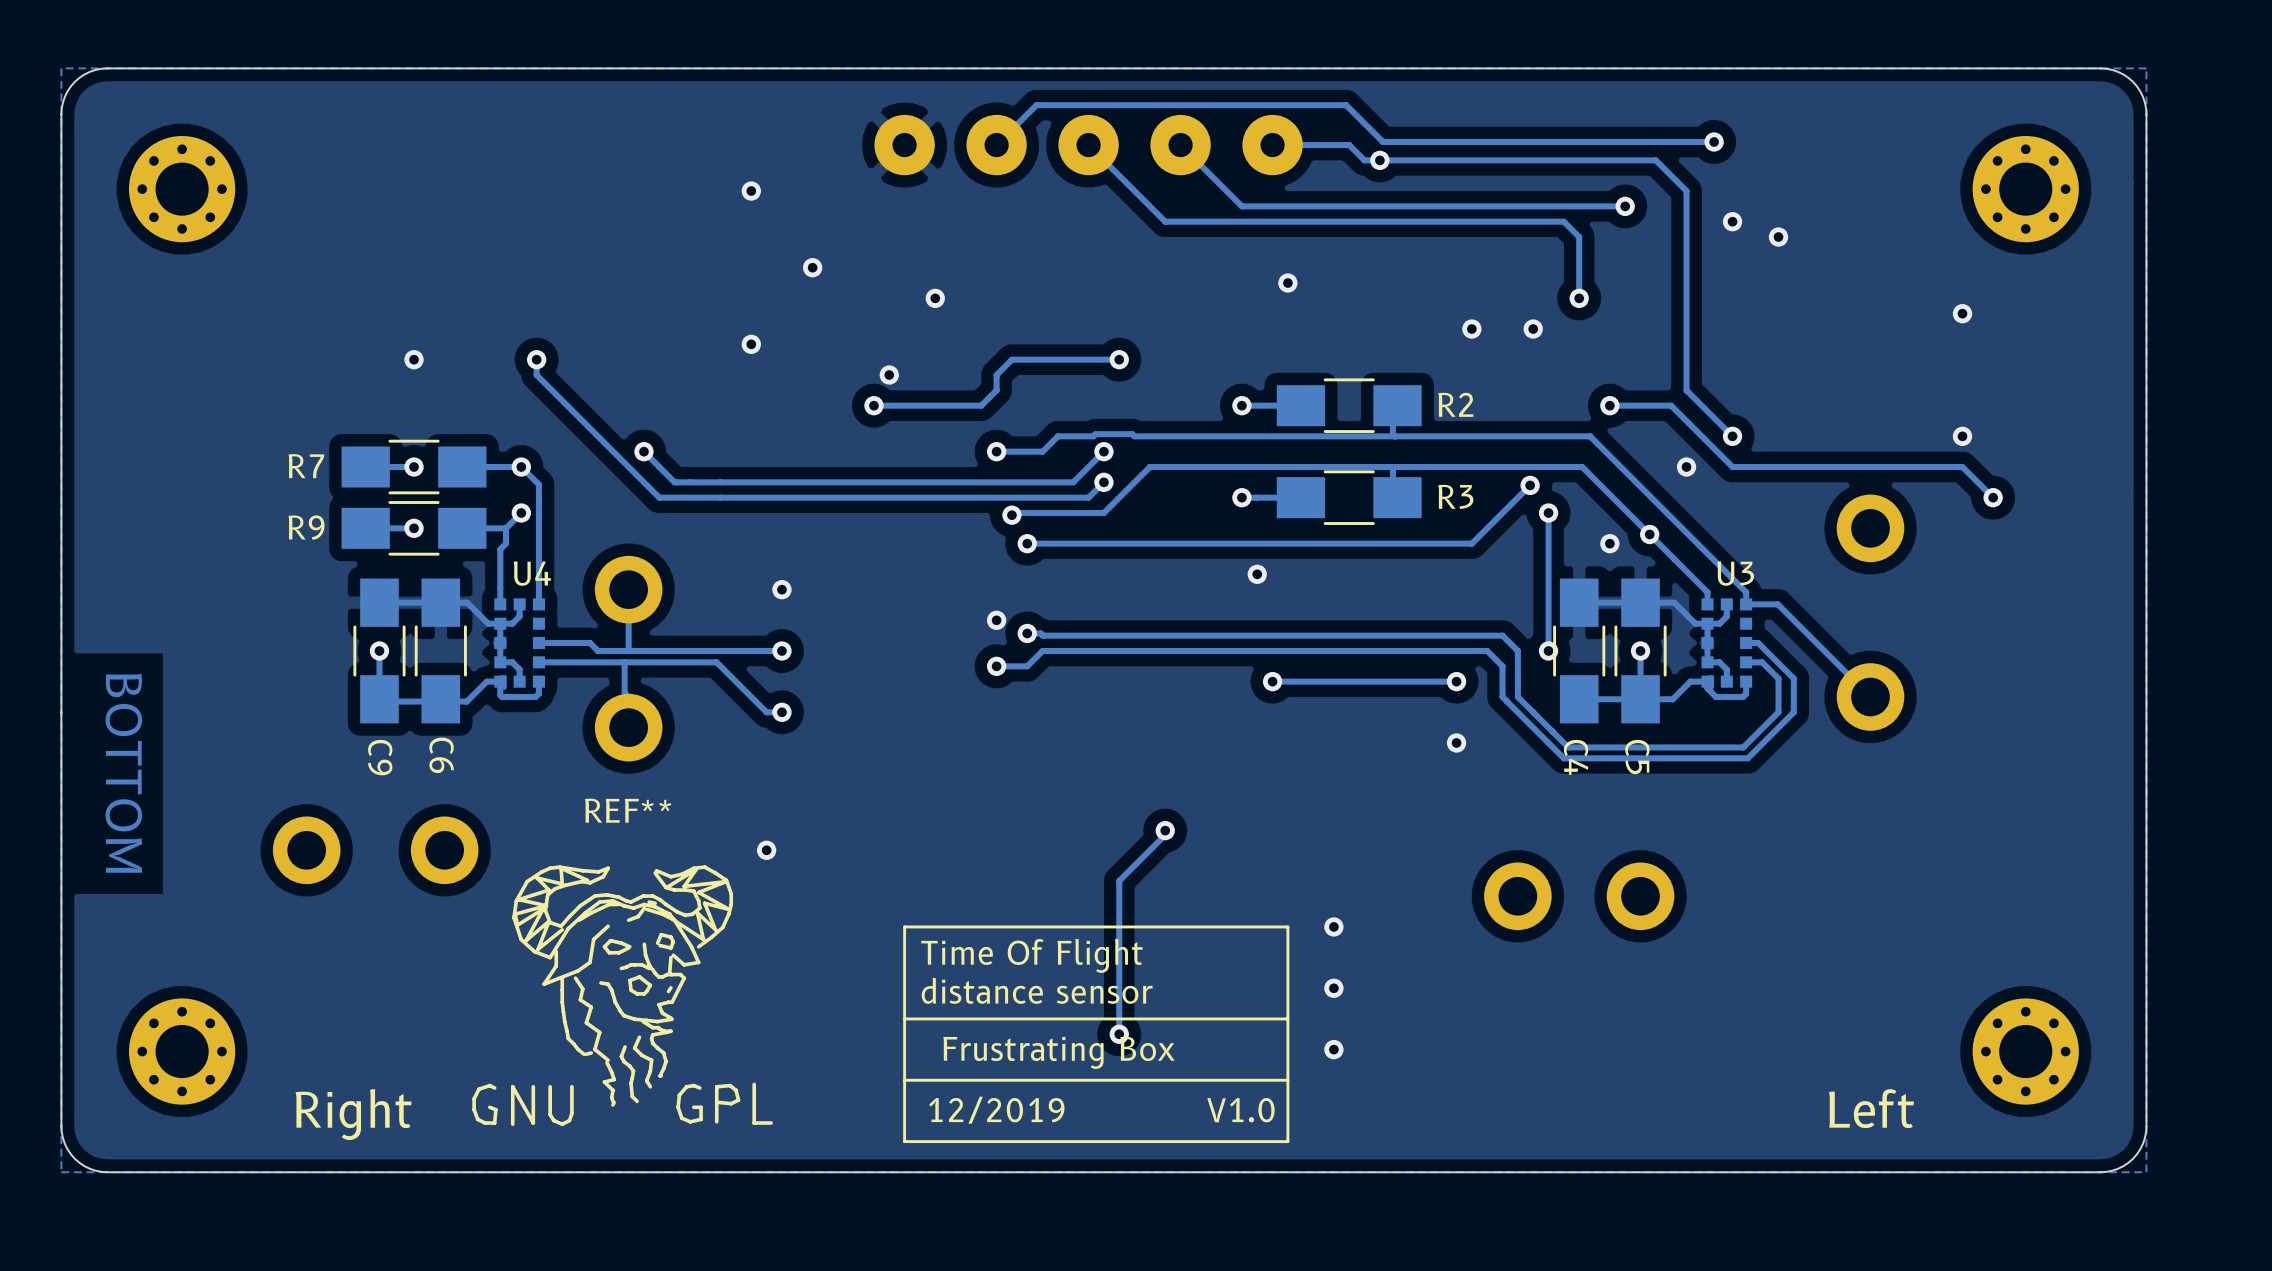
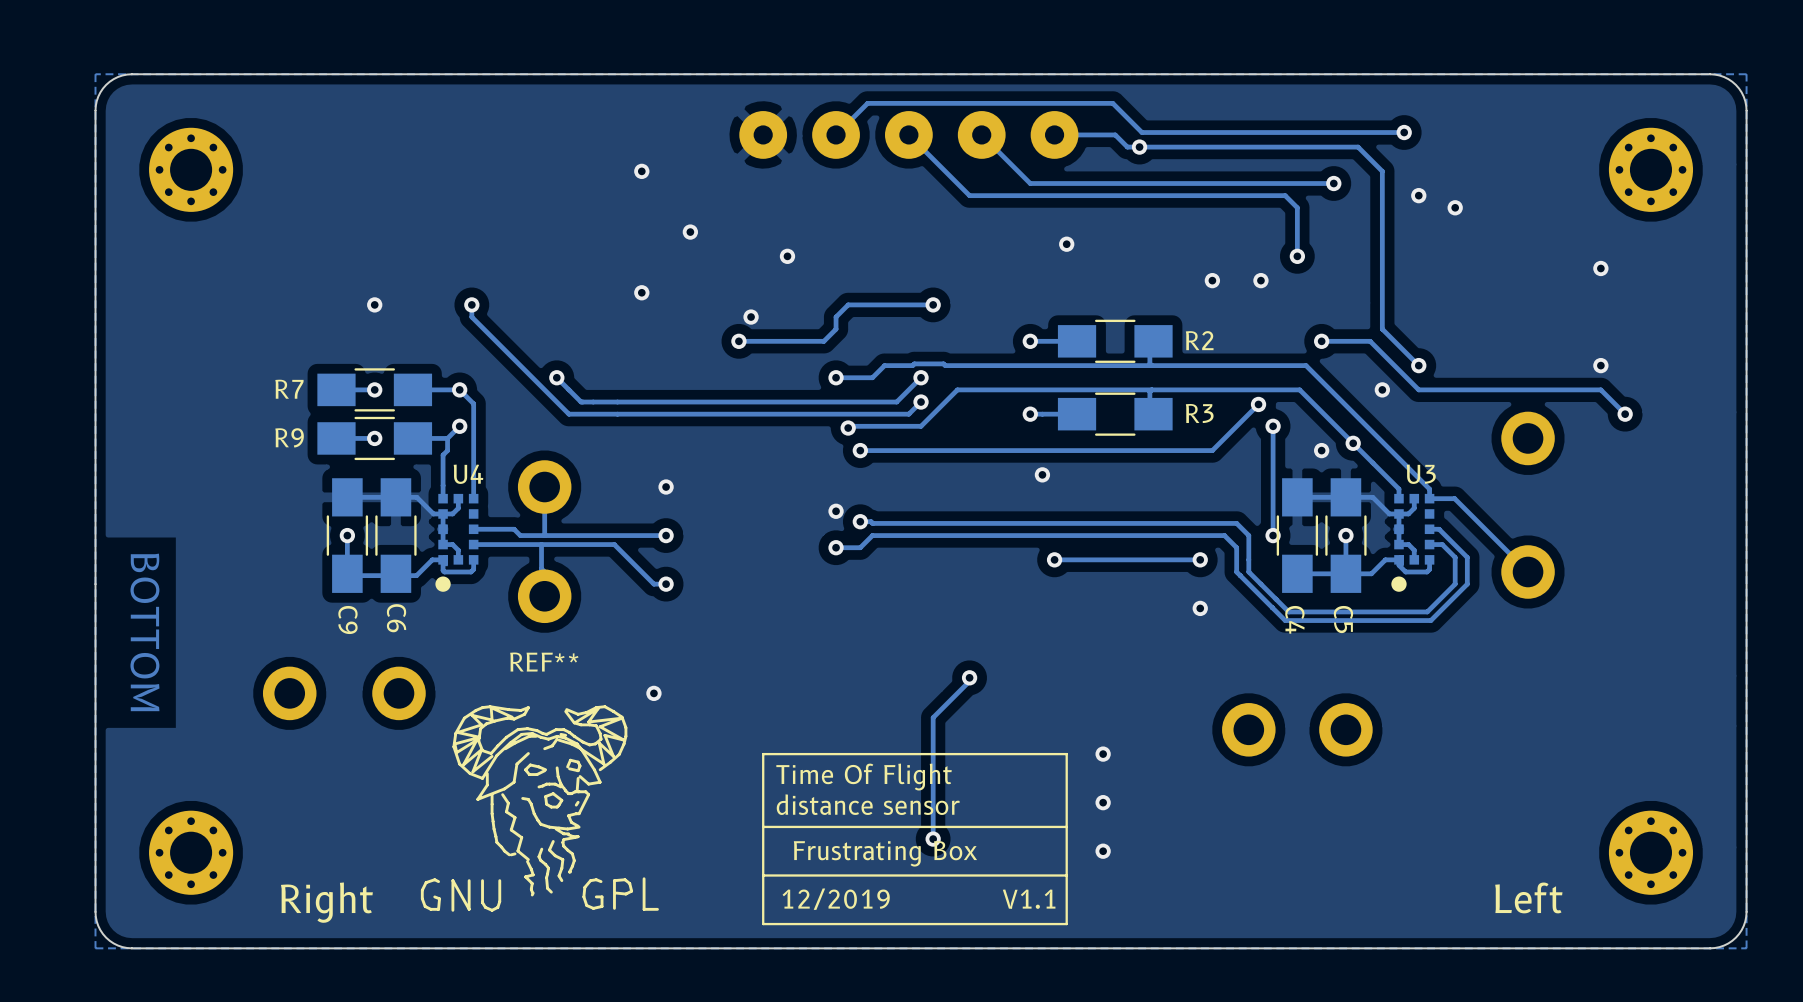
U4 footprint: [494, 598, 545, 690] -> [435, 493, 479, 592]
U3 footprint: [1701, 598, 1753, 690] -> [1391, 493, 1435, 592]
text: V1.0 (1240, 1110) -> V1.1 (1029, 899)

